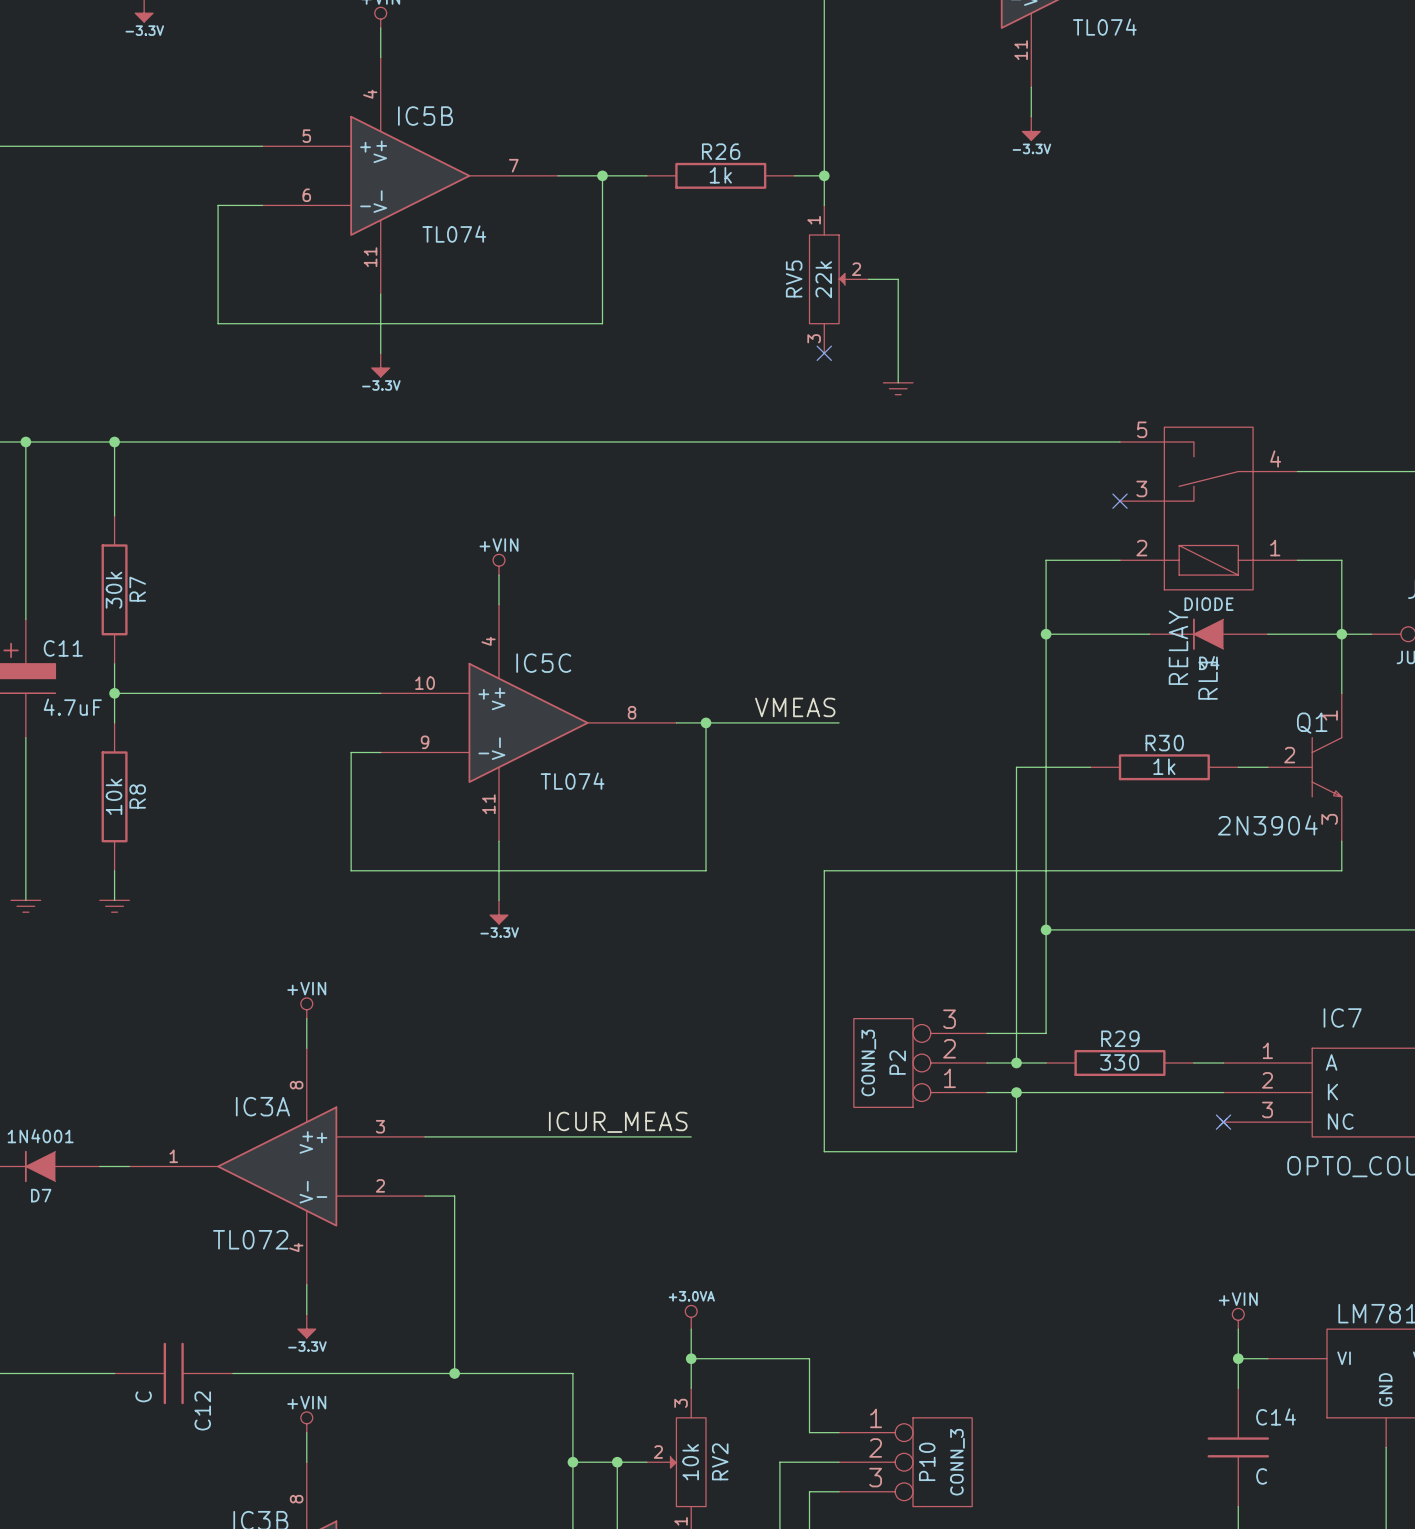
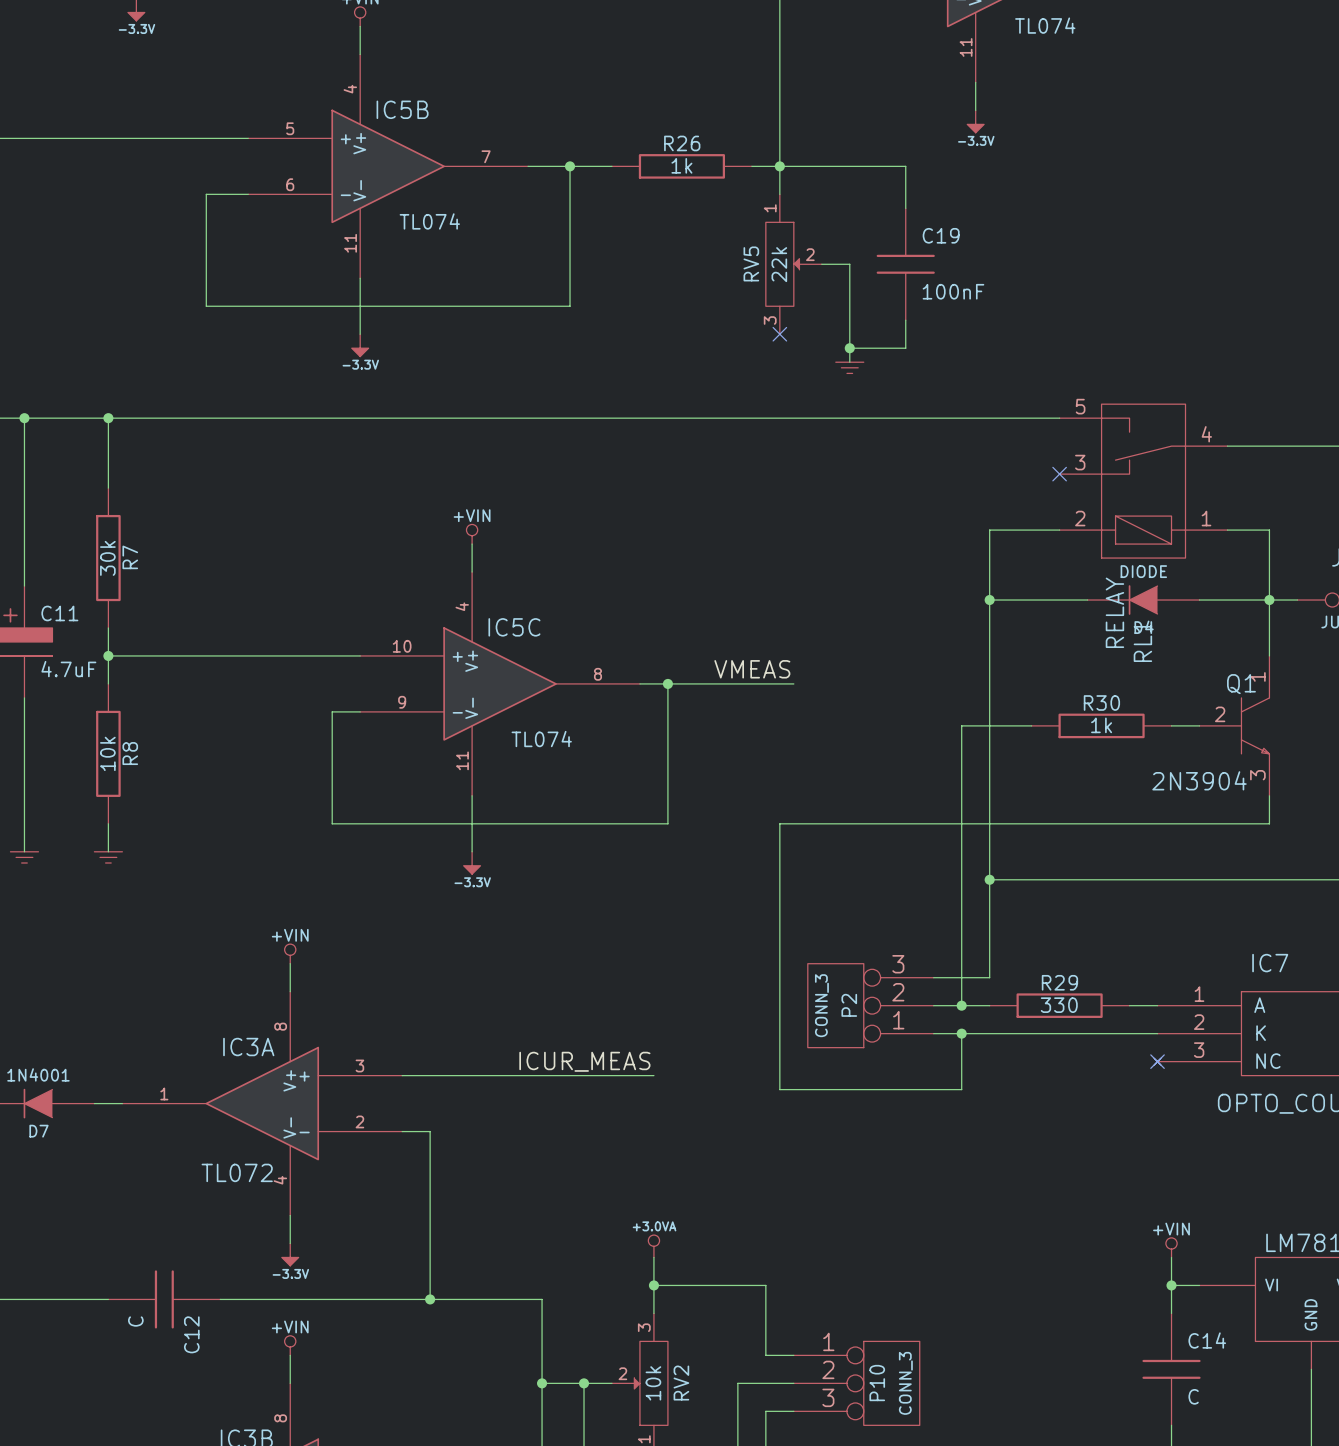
wire: none -> (779, 166) (905, 166) (905, 208)
C19: none -> 100nF (905, 264)
wire: none -> (905, 320) (905, 348) (849, 348)
junction: none -> (849, 348)

